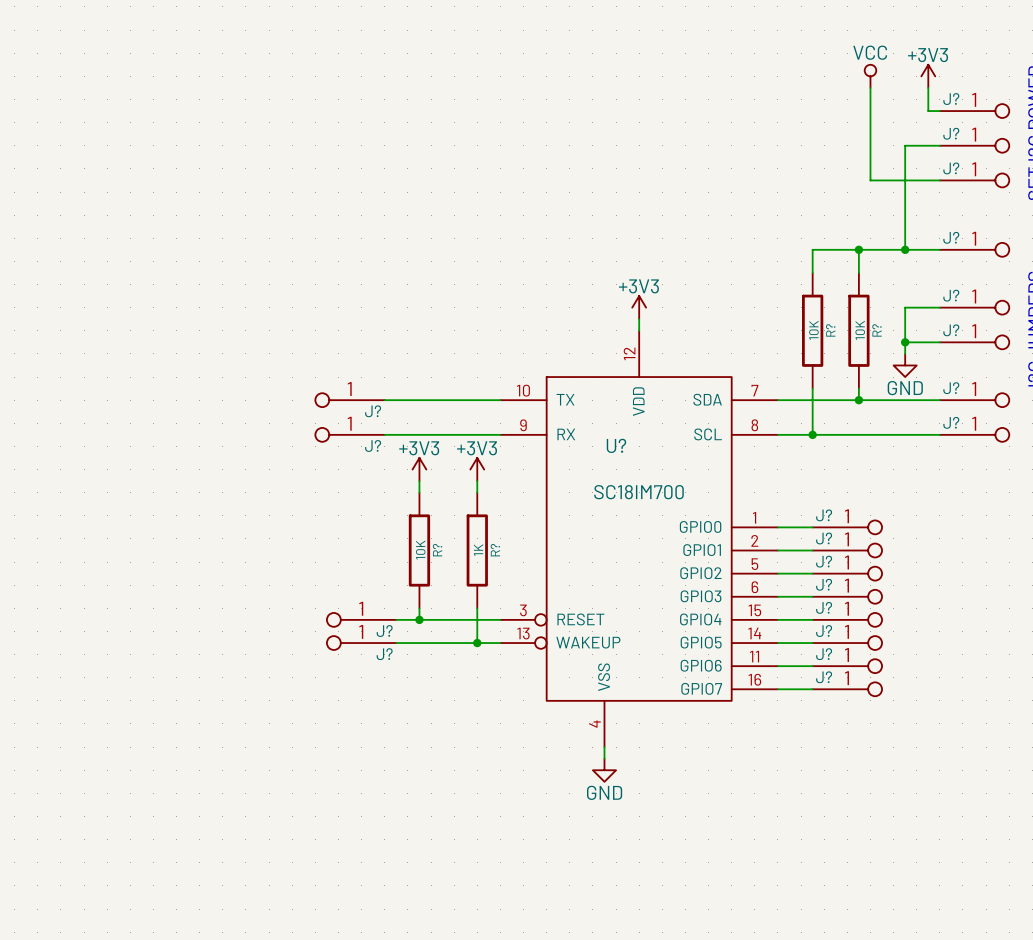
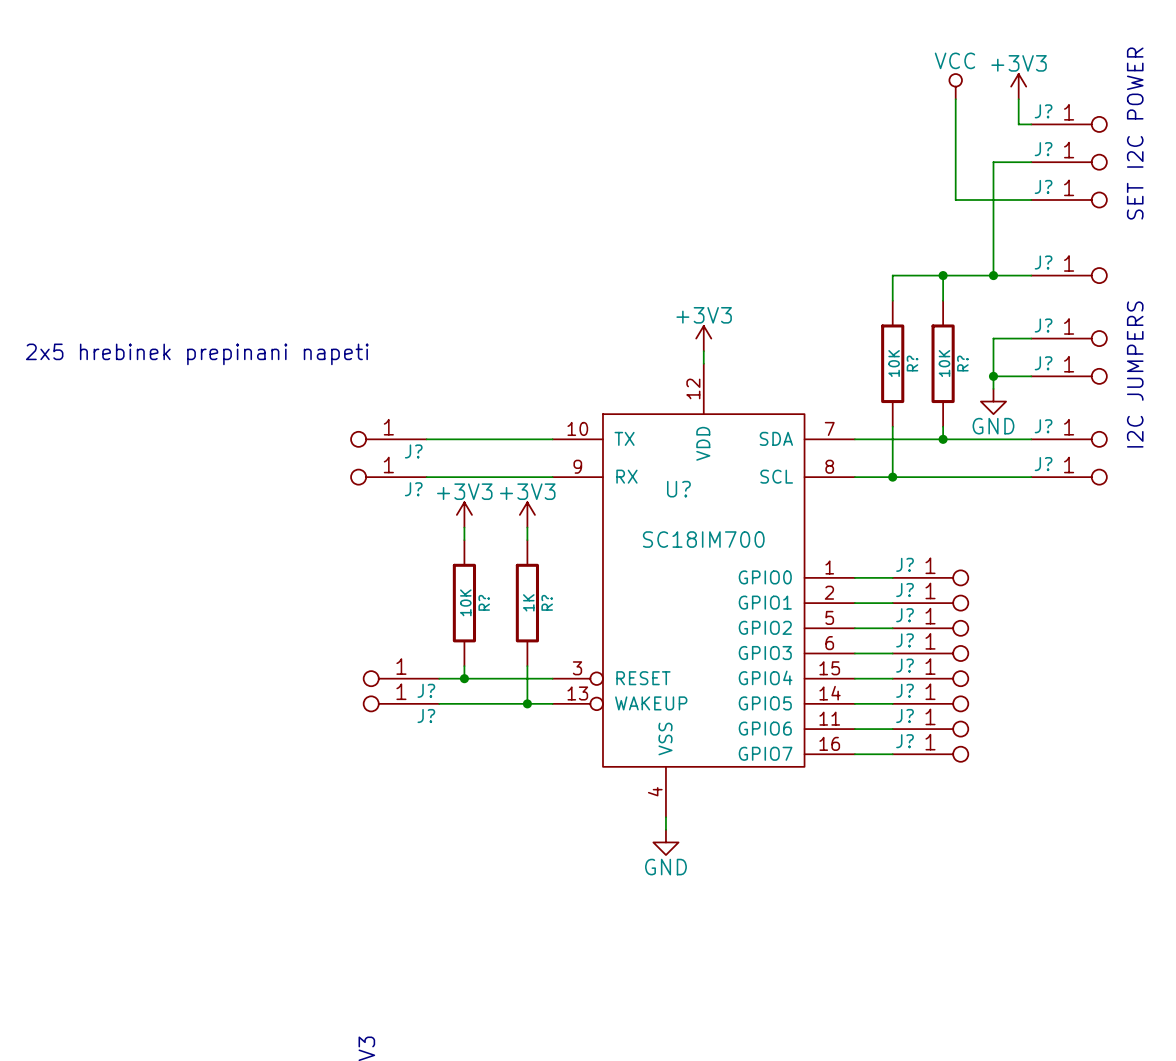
text: none -> 2x5 hrebinek prepinani napeti (197, 354)

